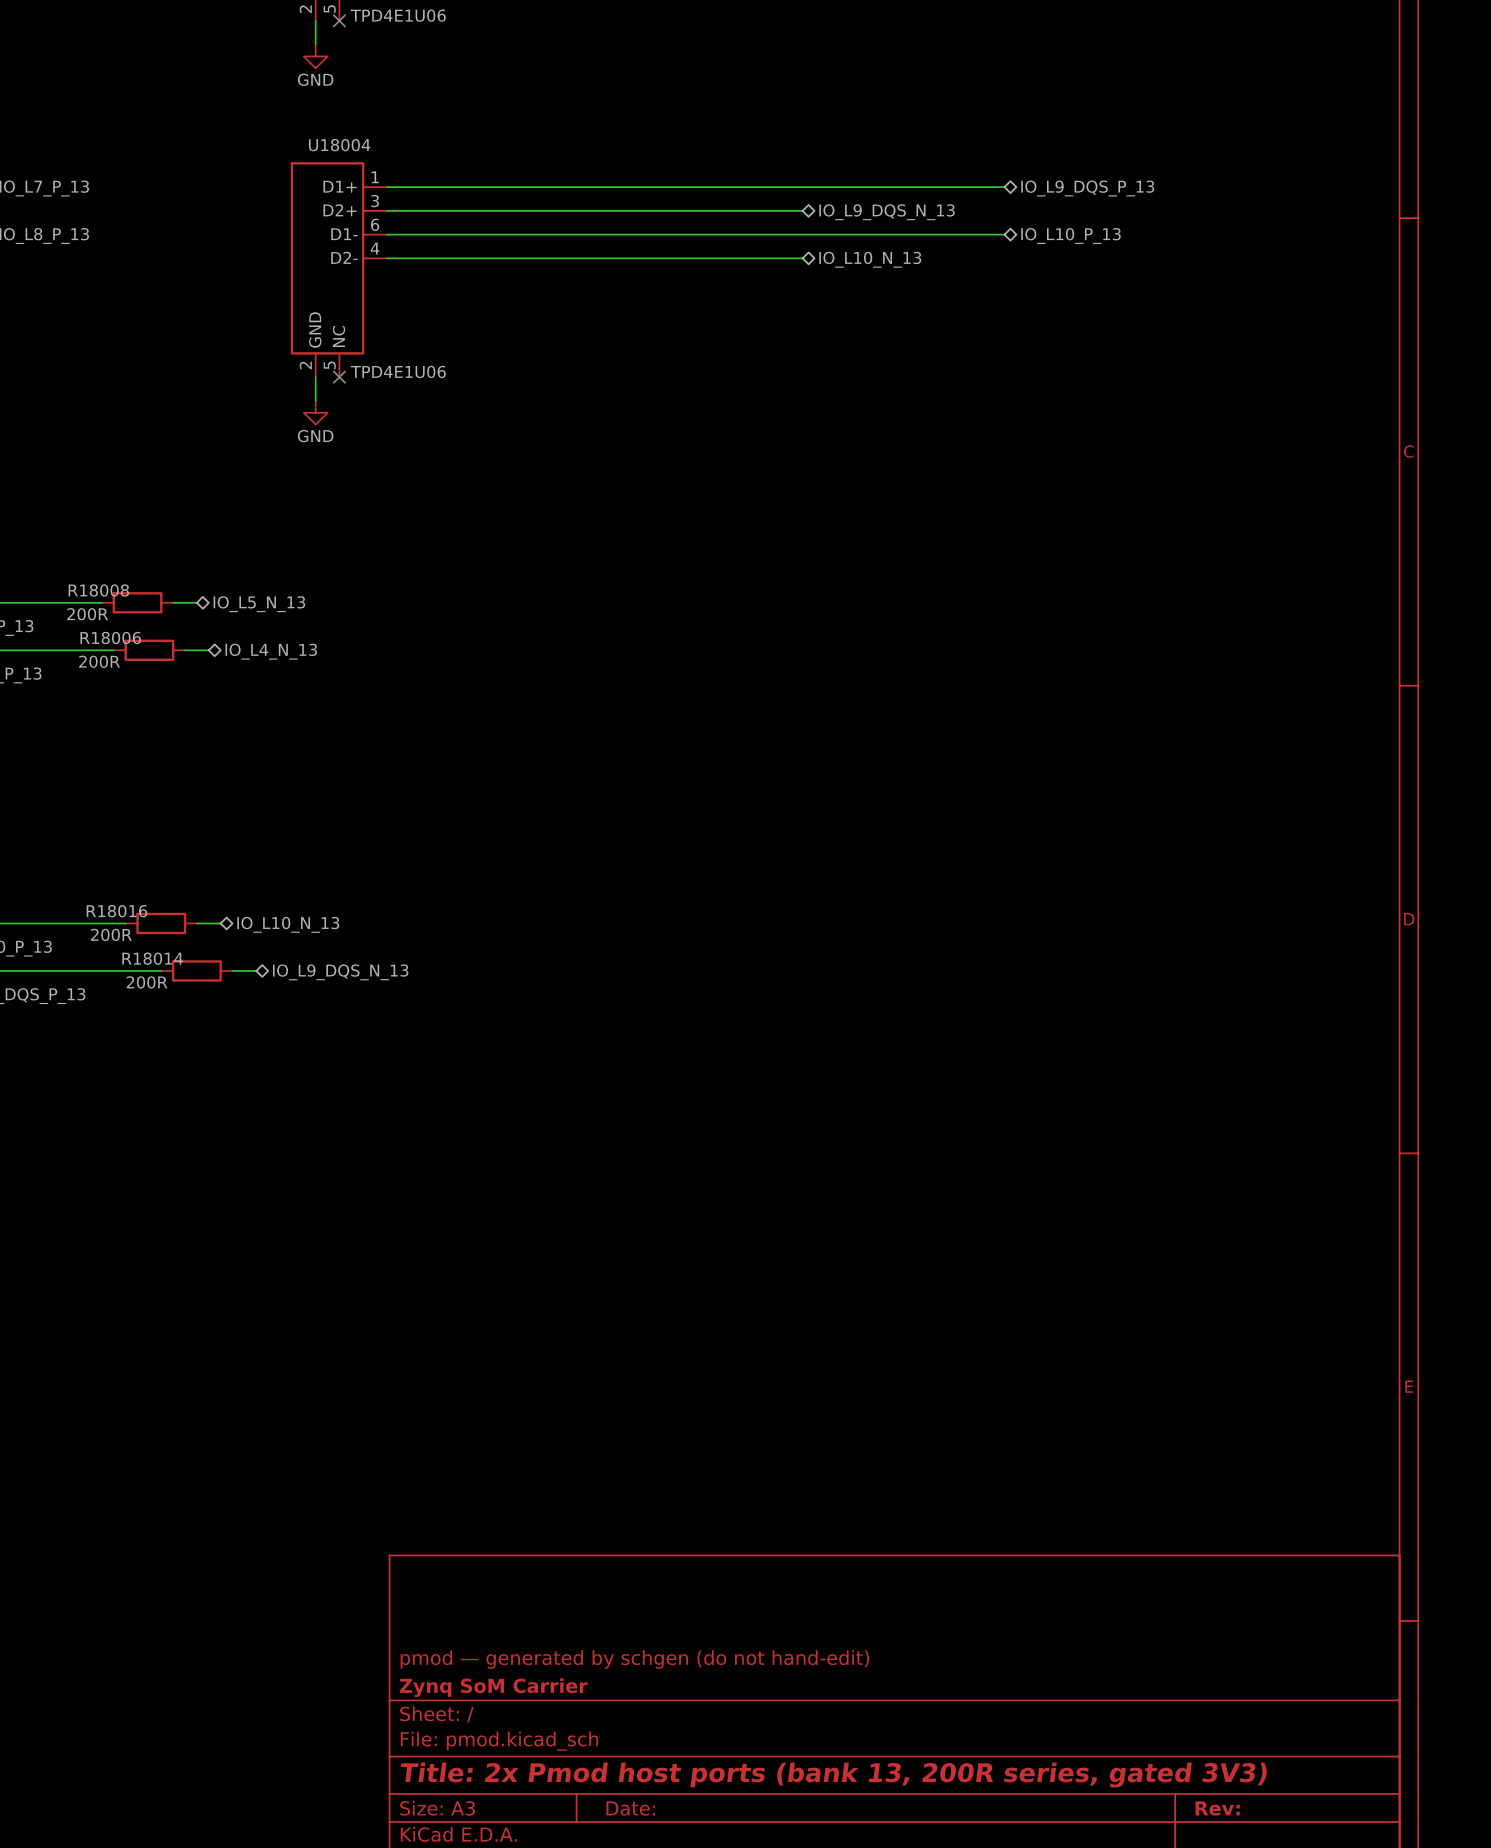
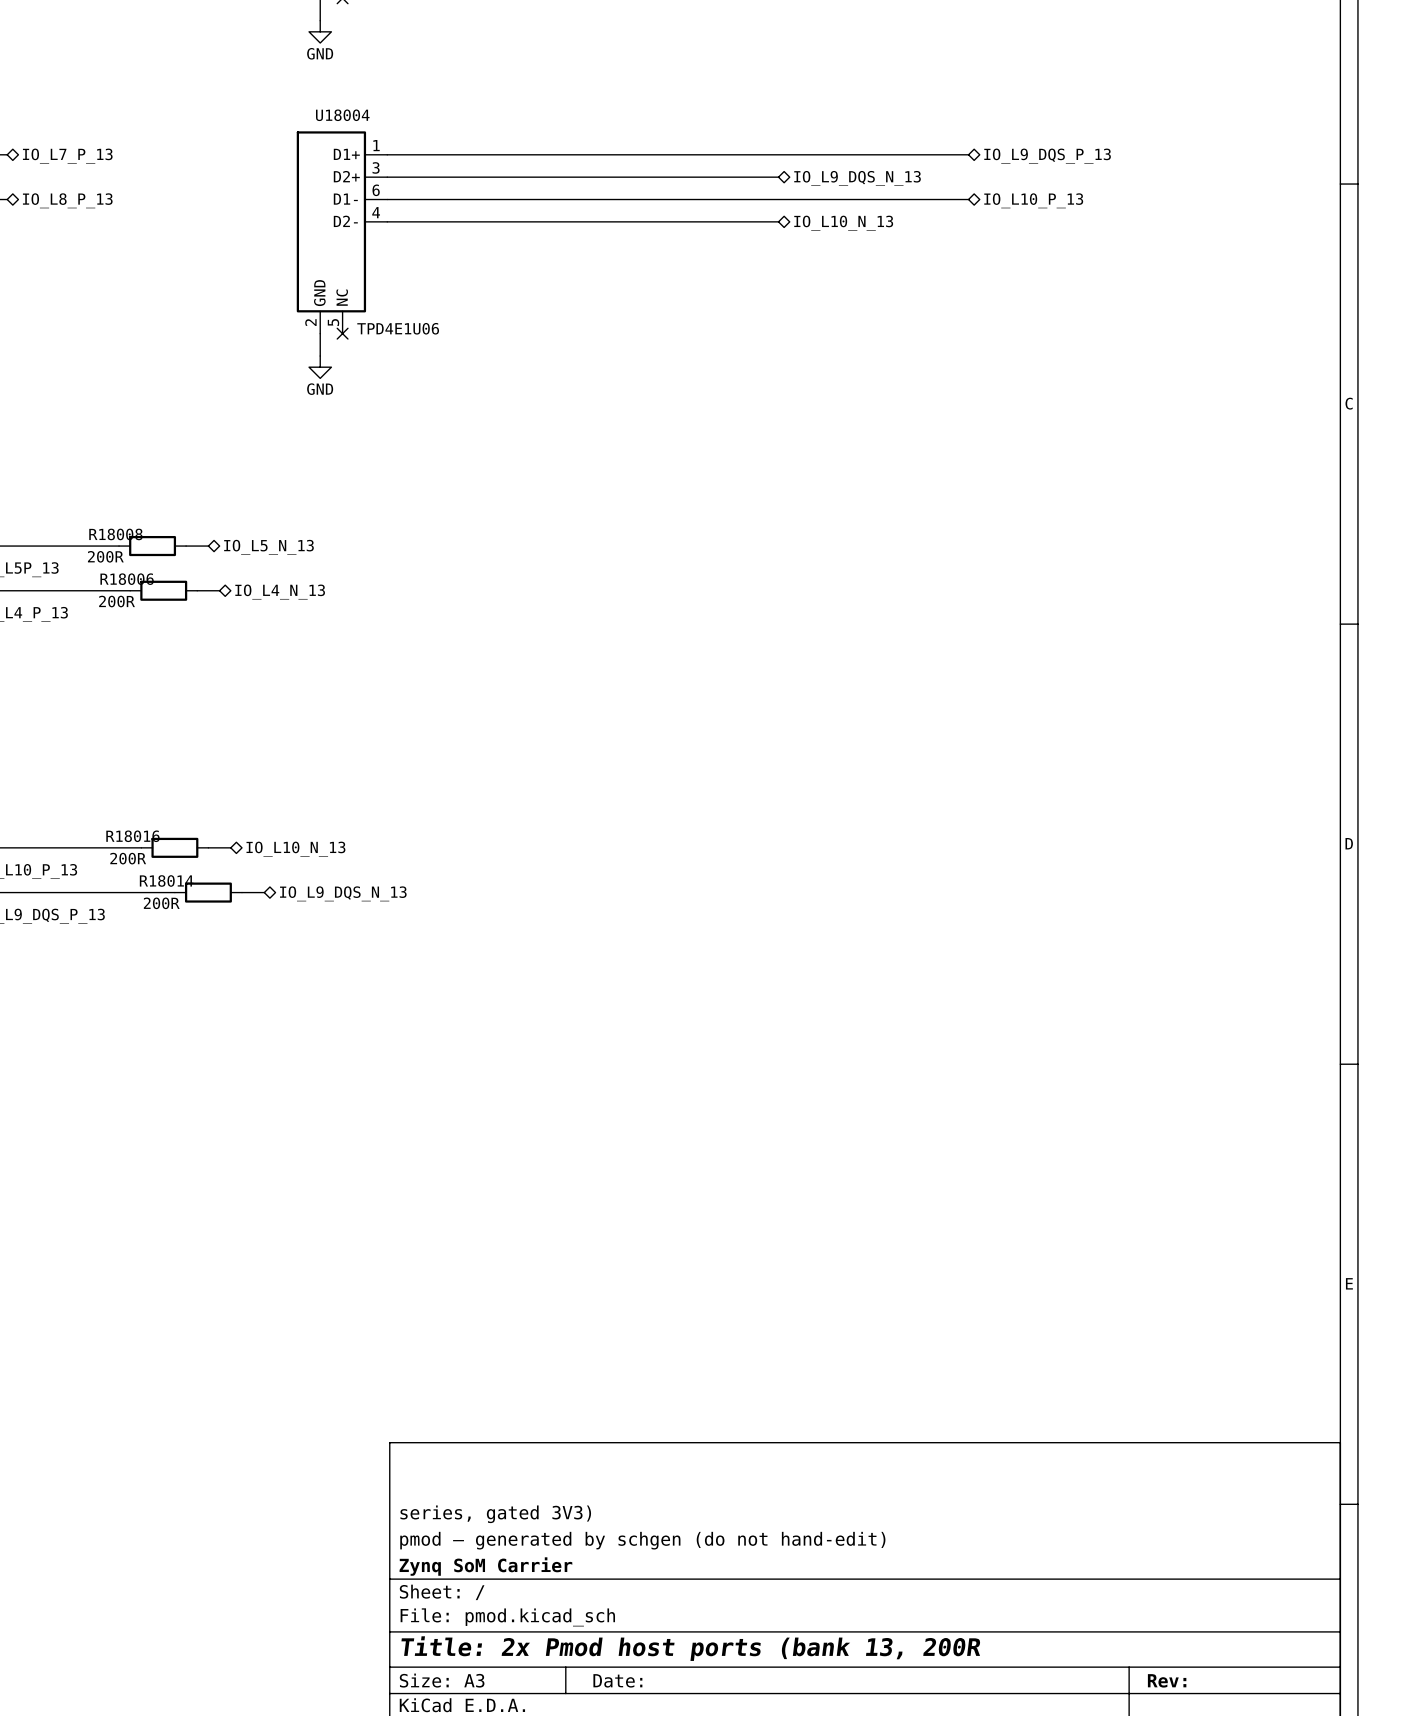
title block: none -> series, gated 3V3) (495, 1514)
title block: Title: 2x Pmod host ports (bank 13, 200R series, gated 3V3) (833, 1775) -> Title: 2x Pmod host ports (bank 13, 200R (690, 1648)

